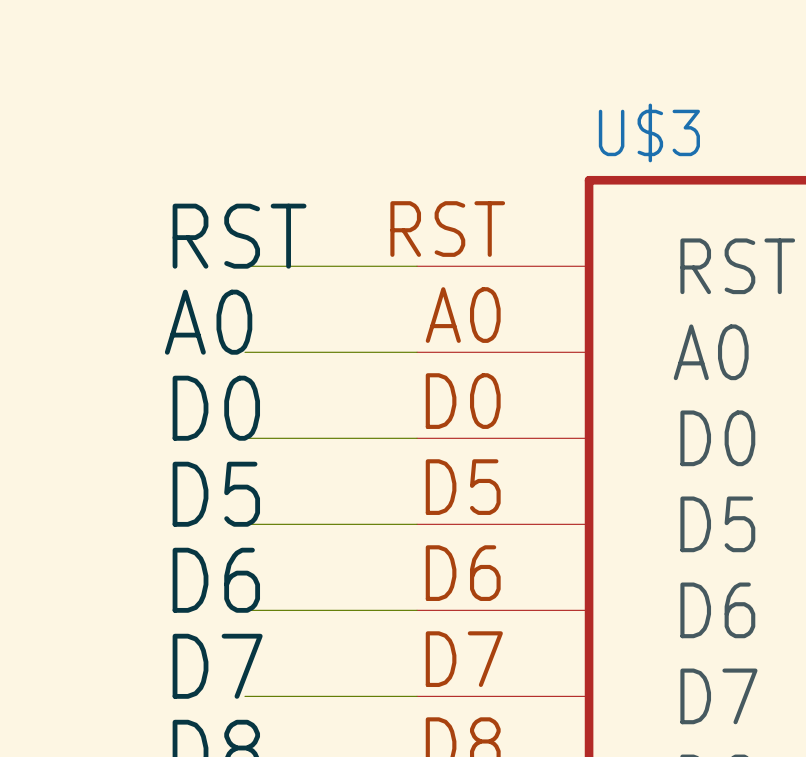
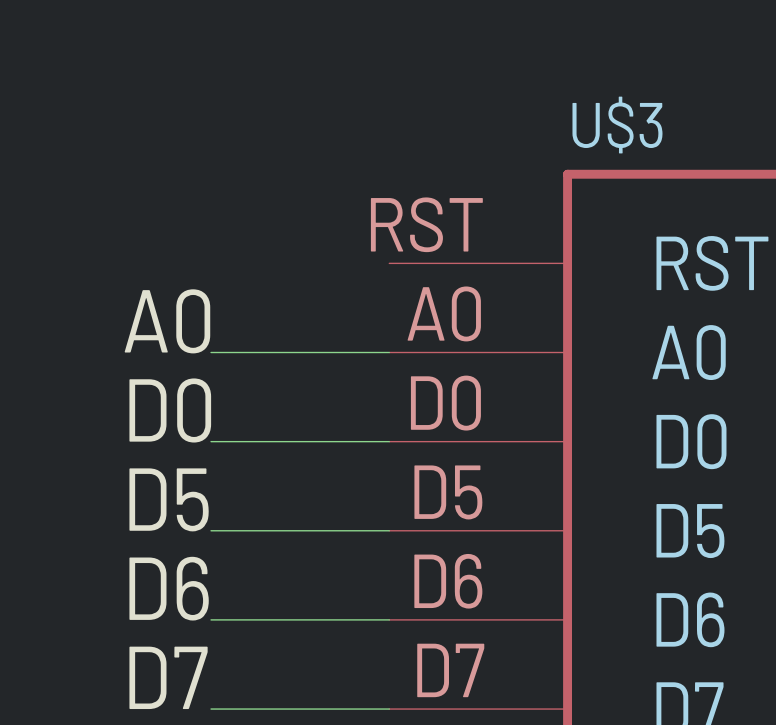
label: RST (239, 236) -> none
wire: (244, 266) (417, 266) -> none

